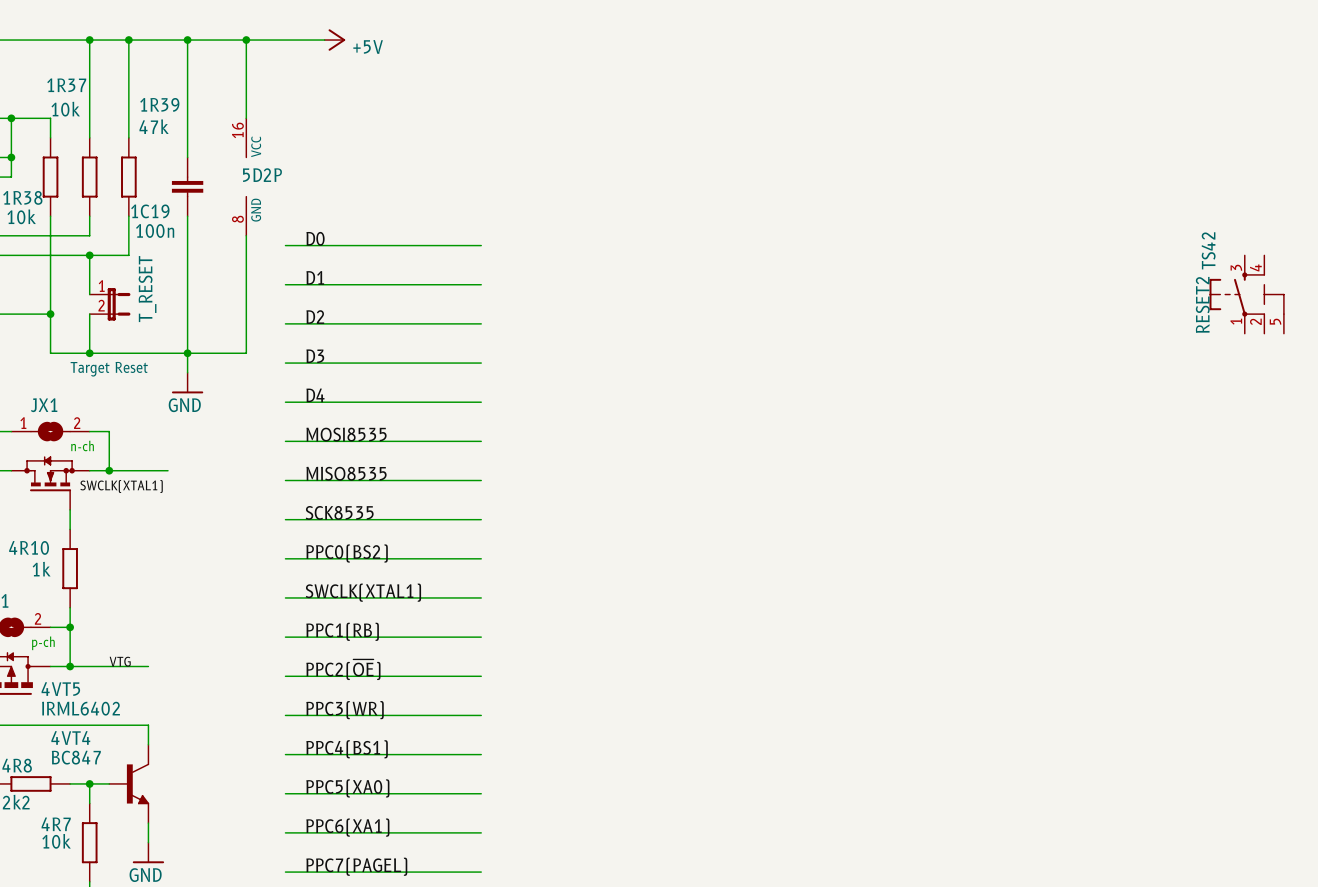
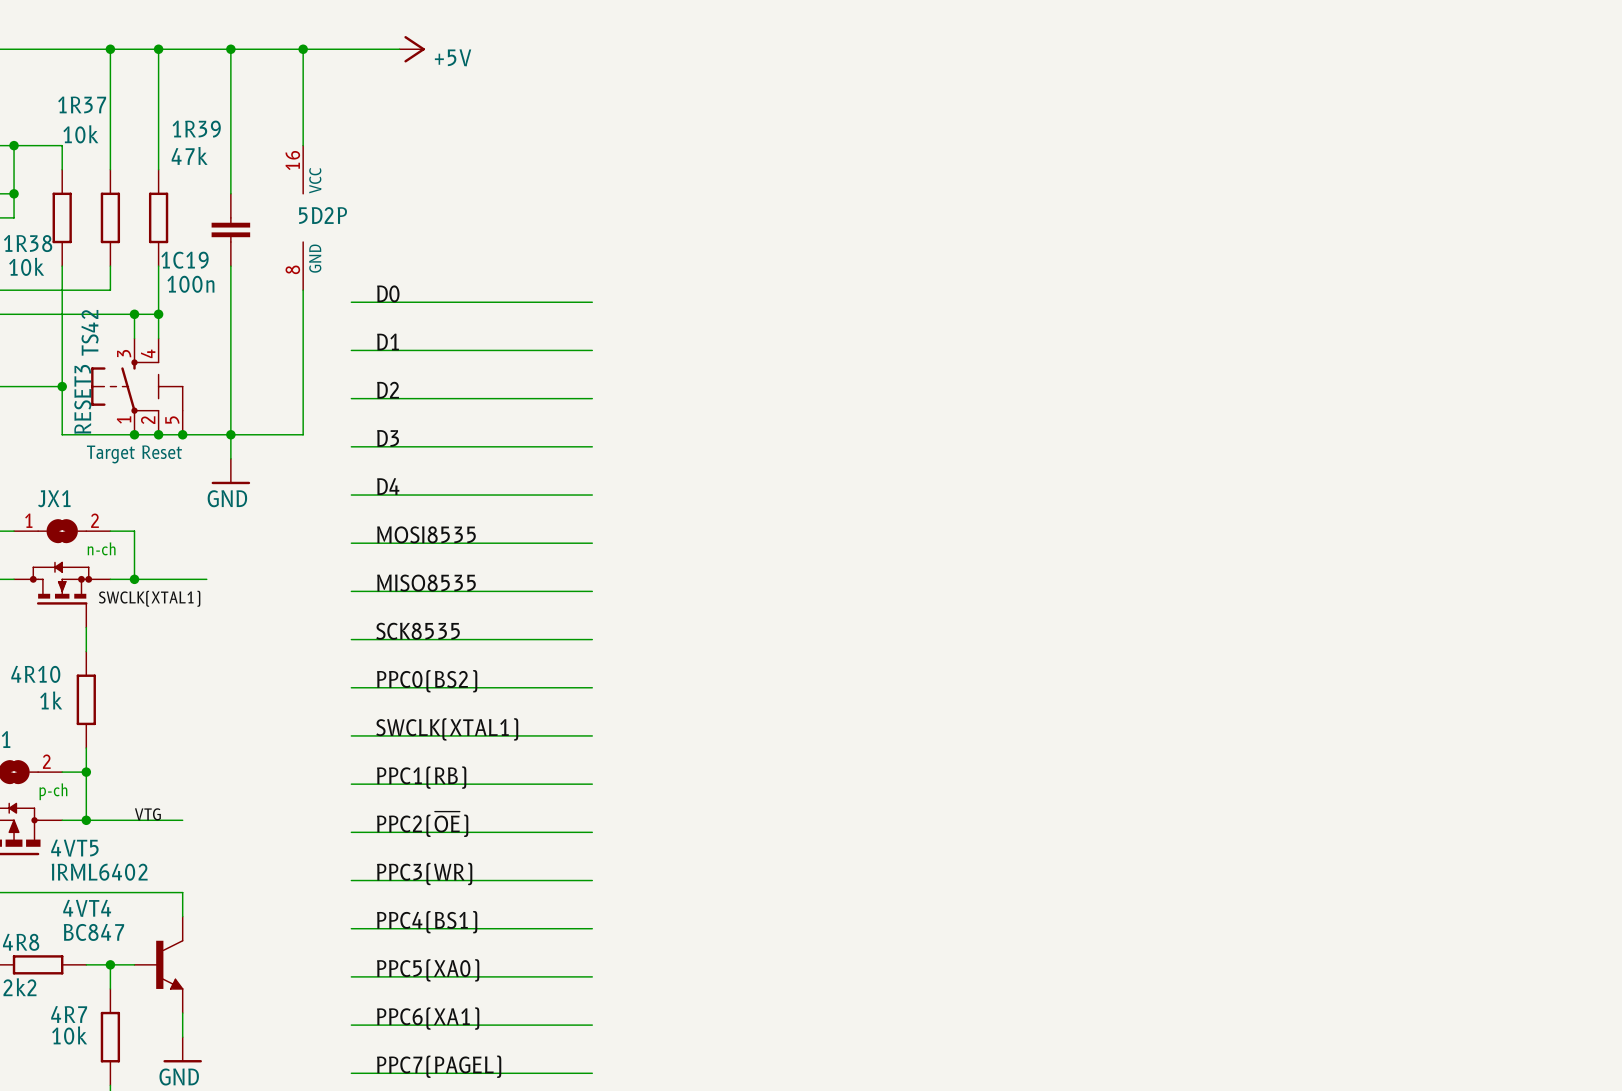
wire: (89, 255) (89, 294) -> none
junction: (89, 255) -> none
wire: none -> (134, 314) (134, 338)
junction: none -> (134, 314)
wire: none -> (158, 314) (158, 338)
junction: none -> (158, 314)
RESET2: TS42 (1247, 294) -> none
T_RESET: (110, 304) -> none
wire: (89, 314) (89, 353) -> none
RESET3: none -> TS42 (137, 386)
junction: (89, 353) -> none
junction: none -> (134, 434)
junction: none -> (158, 434)
junction: none -> (182, 434)

